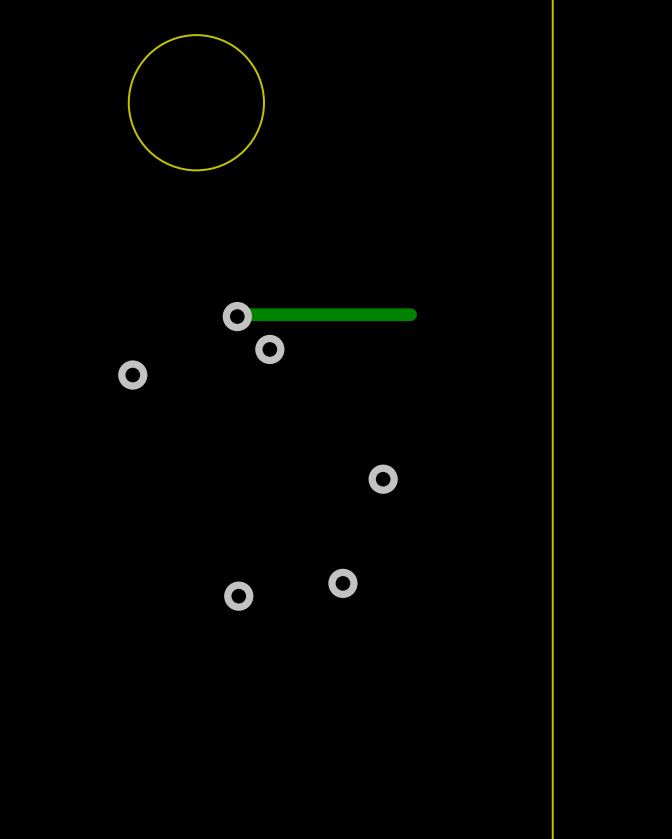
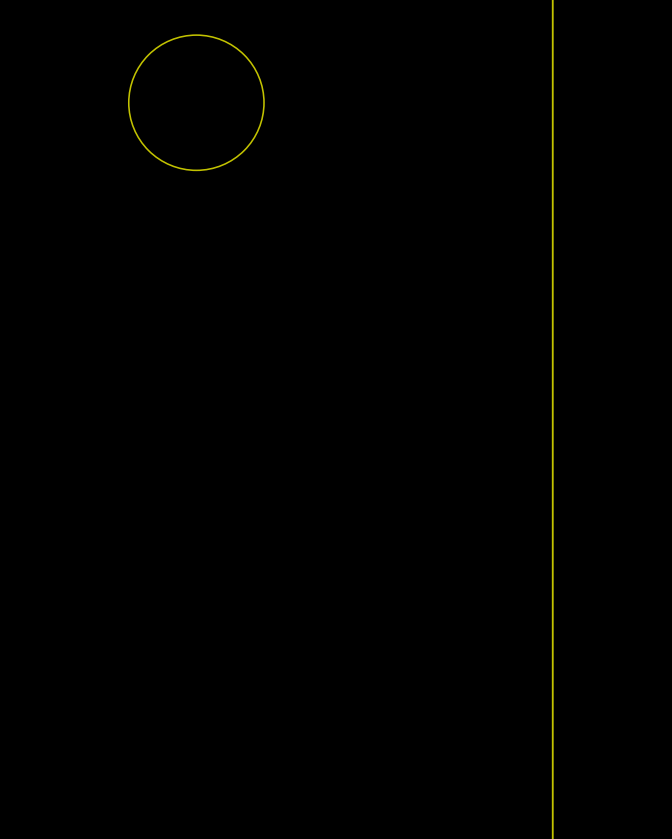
track: (410, 314) (239, 314) (237, 316) -> none
via: (237, 316) -> none
via: (269, 349) -> none
via: (132, 375) -> none
via: (383, 479) -> none
via: (342, 583) -> none
via: (238, 596) -> none

